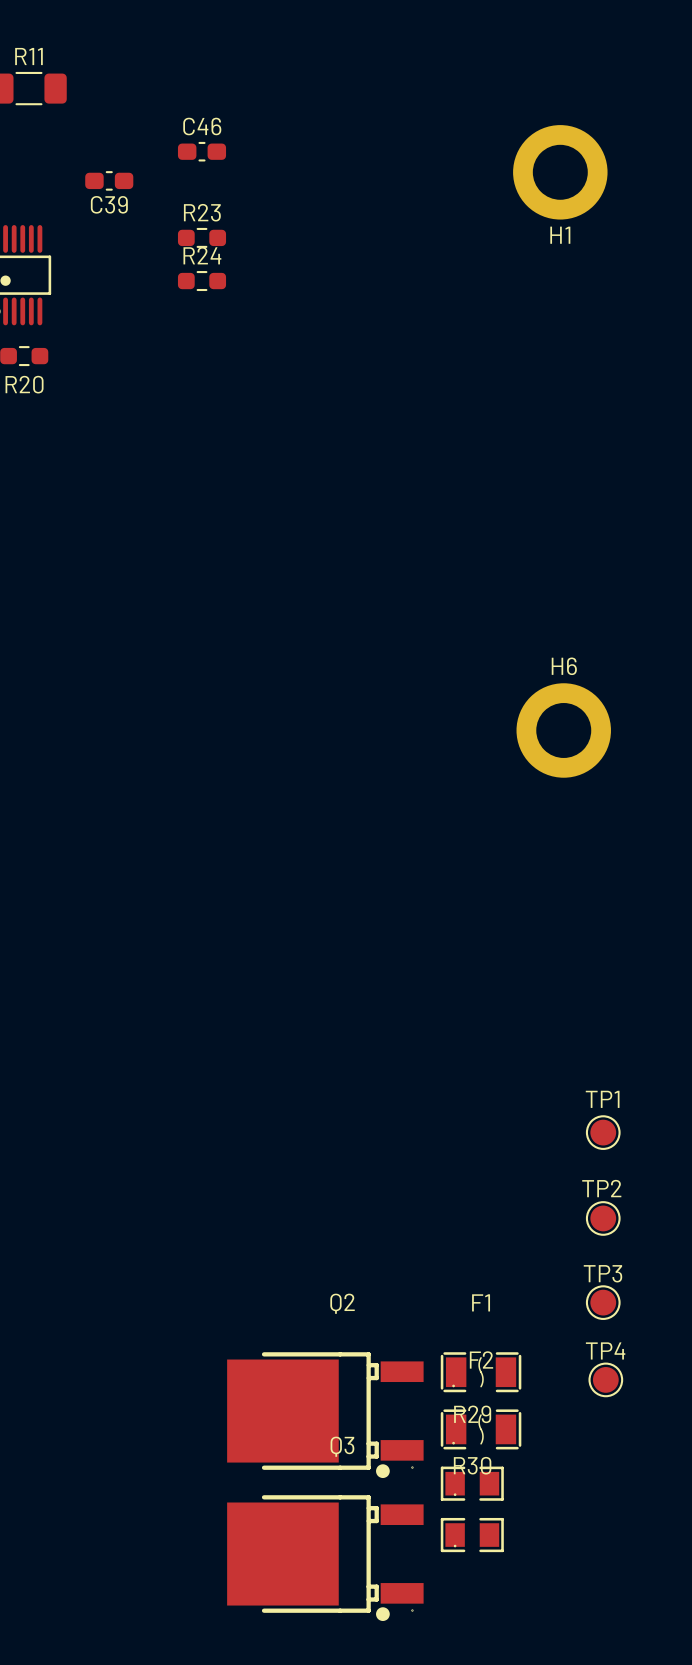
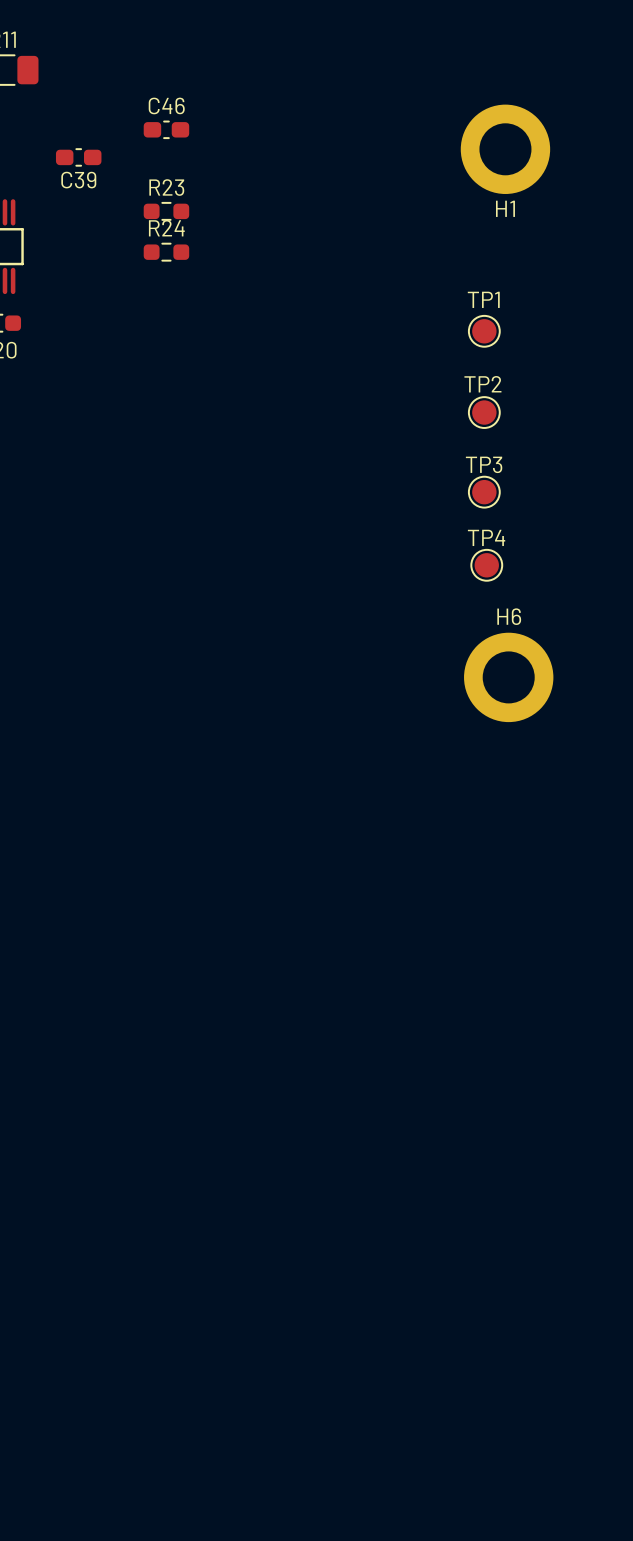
TP1 position: (603, 1132) -> (484, 331)
TP2 position: (603, 1218) -> (484, 412)
TP3 position: (603, 1302) -> (484, 492)
F1: (481, 1372) -> none
TP4 position: (605, 1379) -> (486, 565)
Q2: (325, 1415) -> none
F2: (481, 1429) -> none
R29: (472, 1483) -> none
R30: (472, 1535) -> none
Q3: (325, 1558) -> none

